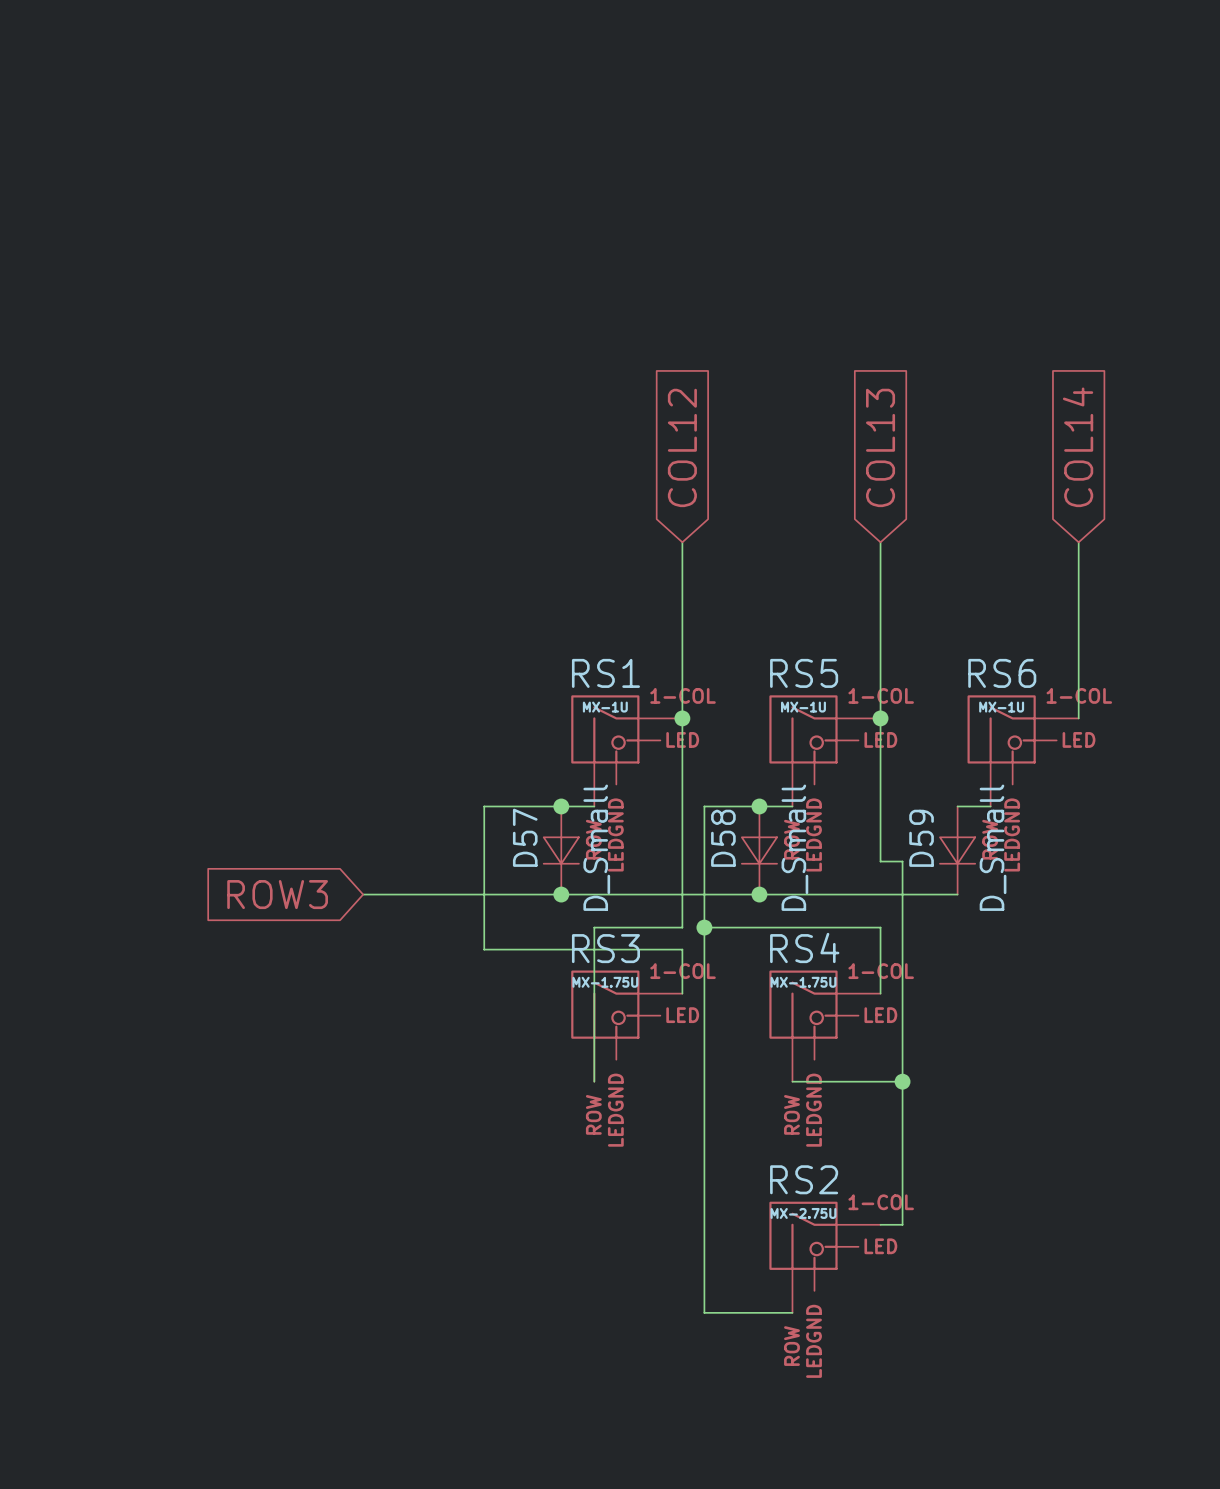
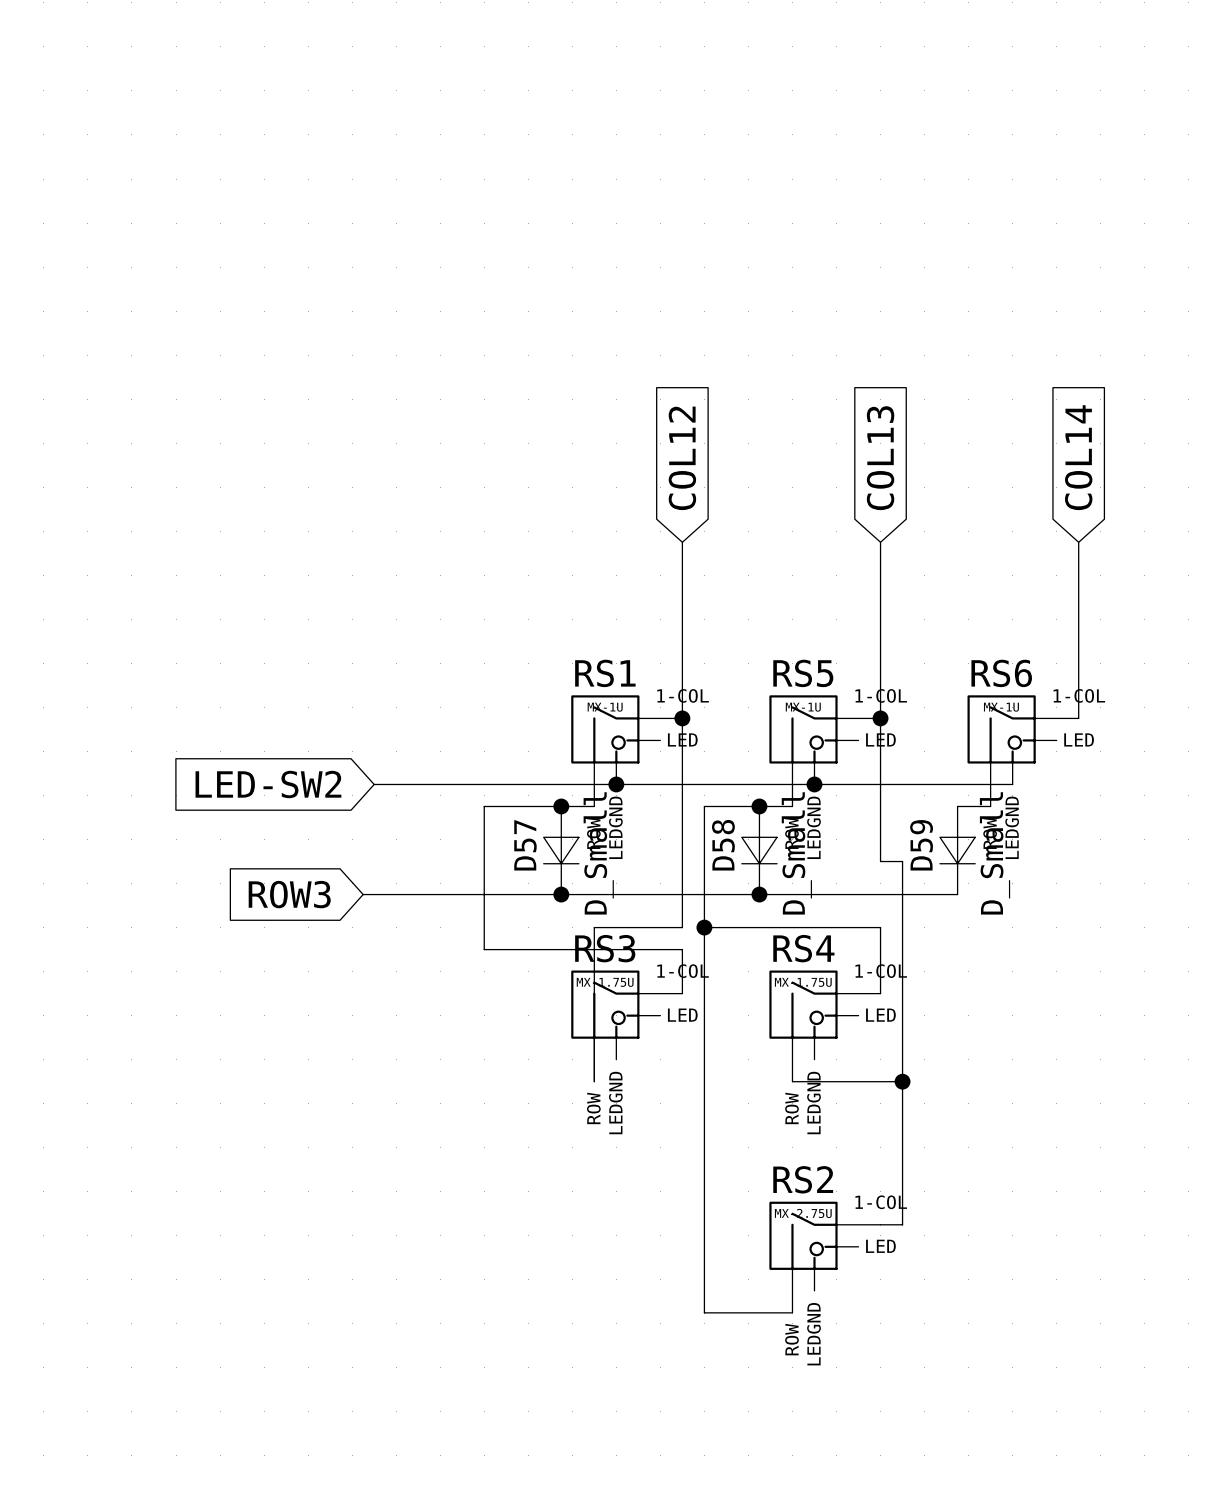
global label: none -> LED-SW2 (268, 784)
wire: none -> (374, 784) (1012, 784)
junction: none -> (616, 784)
junction: none -> (814, 784)

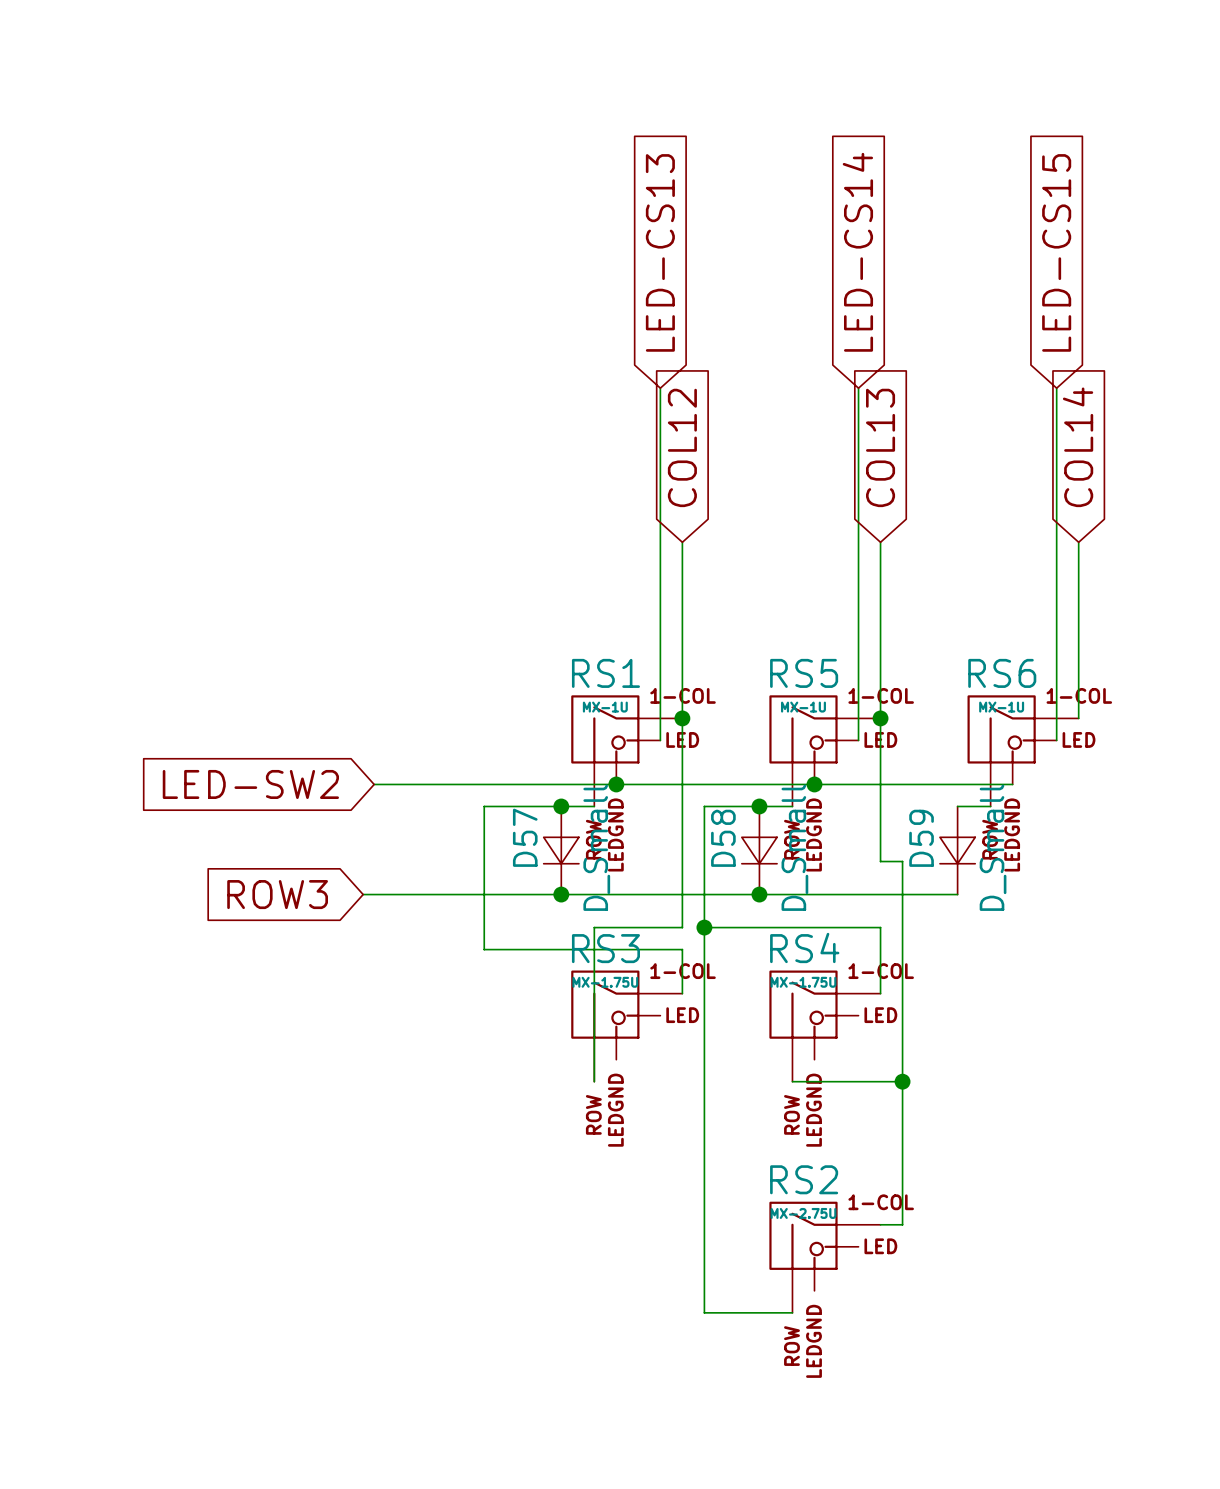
global label: none -> LED-CS13 (660, 252)
global label: none -> LED-CS14 (857, 252)
global label: none -> LED-CS15 (1056, 252)
wire: none -> (660, 388) (660, 740)
wire: none -> (858, 388) (858, 740)
wire: none -> (1056, 388) (1056, 740)

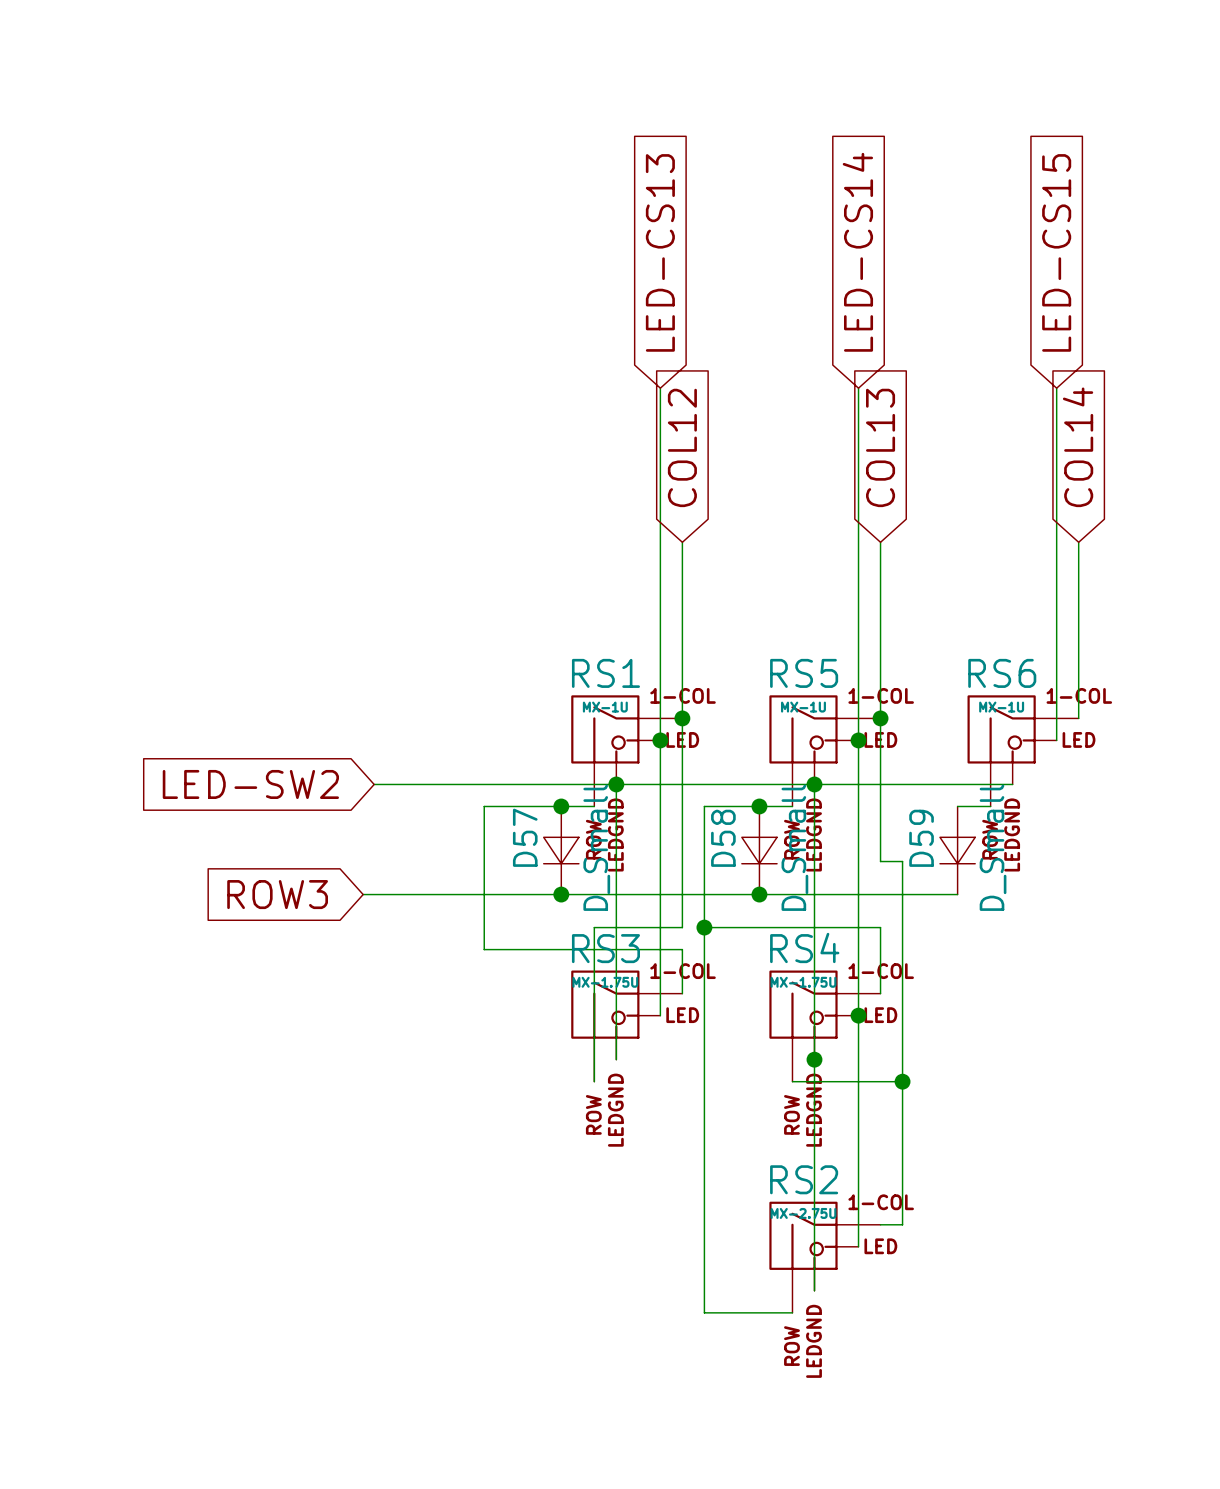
wire: none -> (660, 740) (660, 1015)
junction: none -> (660, 740)
wire: none -> (858, 740) (858, 1246)
junction: none -> (858, 740)
wire: none -> (616, 784) (616, 1059)
wire: none -> (814, 784) (814, 1290)
junction: none -> (858, 1015)
junction: none -> (814, 1059)

